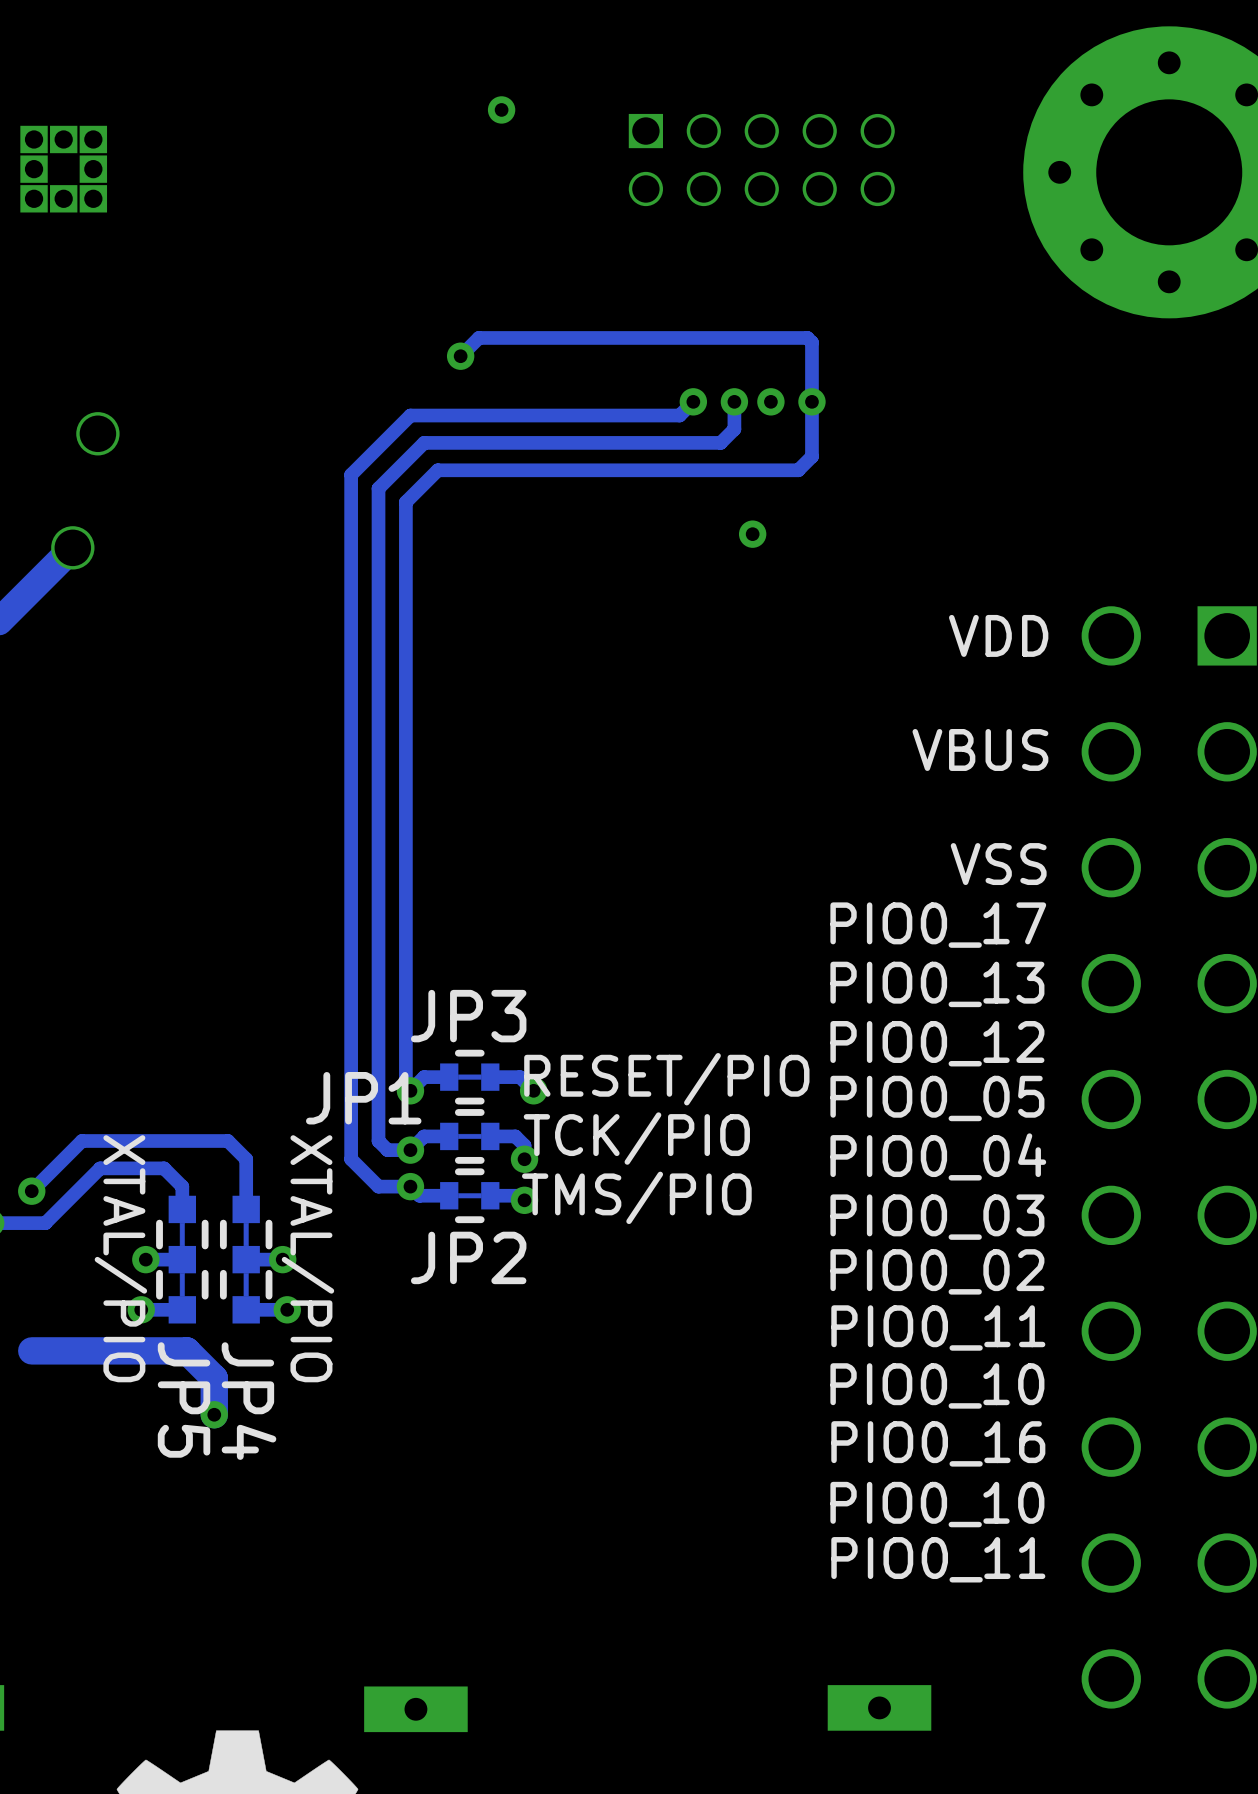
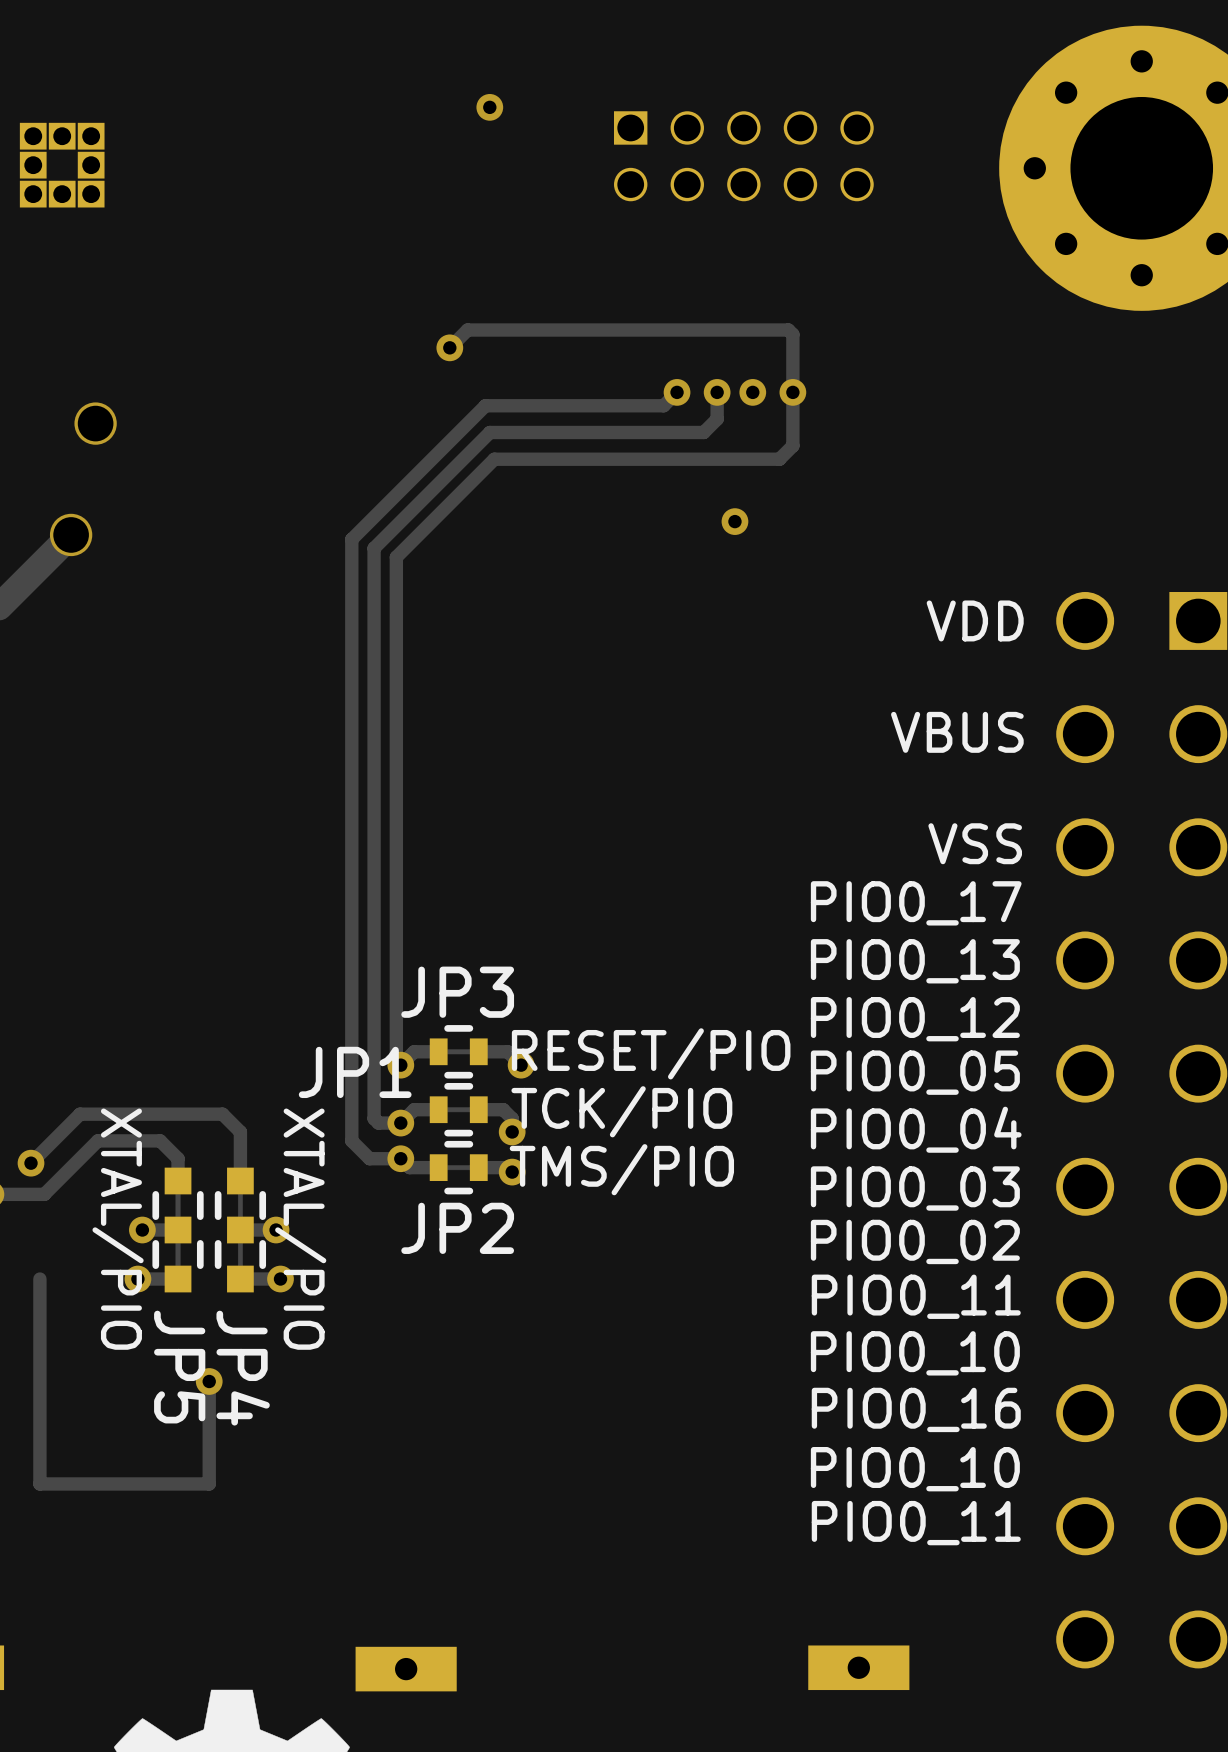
track: (497, 415) (410, 415) (351, 474) (351, 1159) (360, 1168) -> (485, 405) (351, 539) (351, 1140)
track: (501, 442) (424, 442) (378, 488) (378, 1141) (383, 1145) -> (489, 432) (374, 548) (374, 1118)
track: (506, 470) (437, 470) (405, 502) (405, 570) -> (494, 459) (396, 557)
track: (31, 1350) (186, 1350) (214, 1378) (214, 1414) -> (39, 1279) (39, 1483) (209, 1483) (209, 1381)

